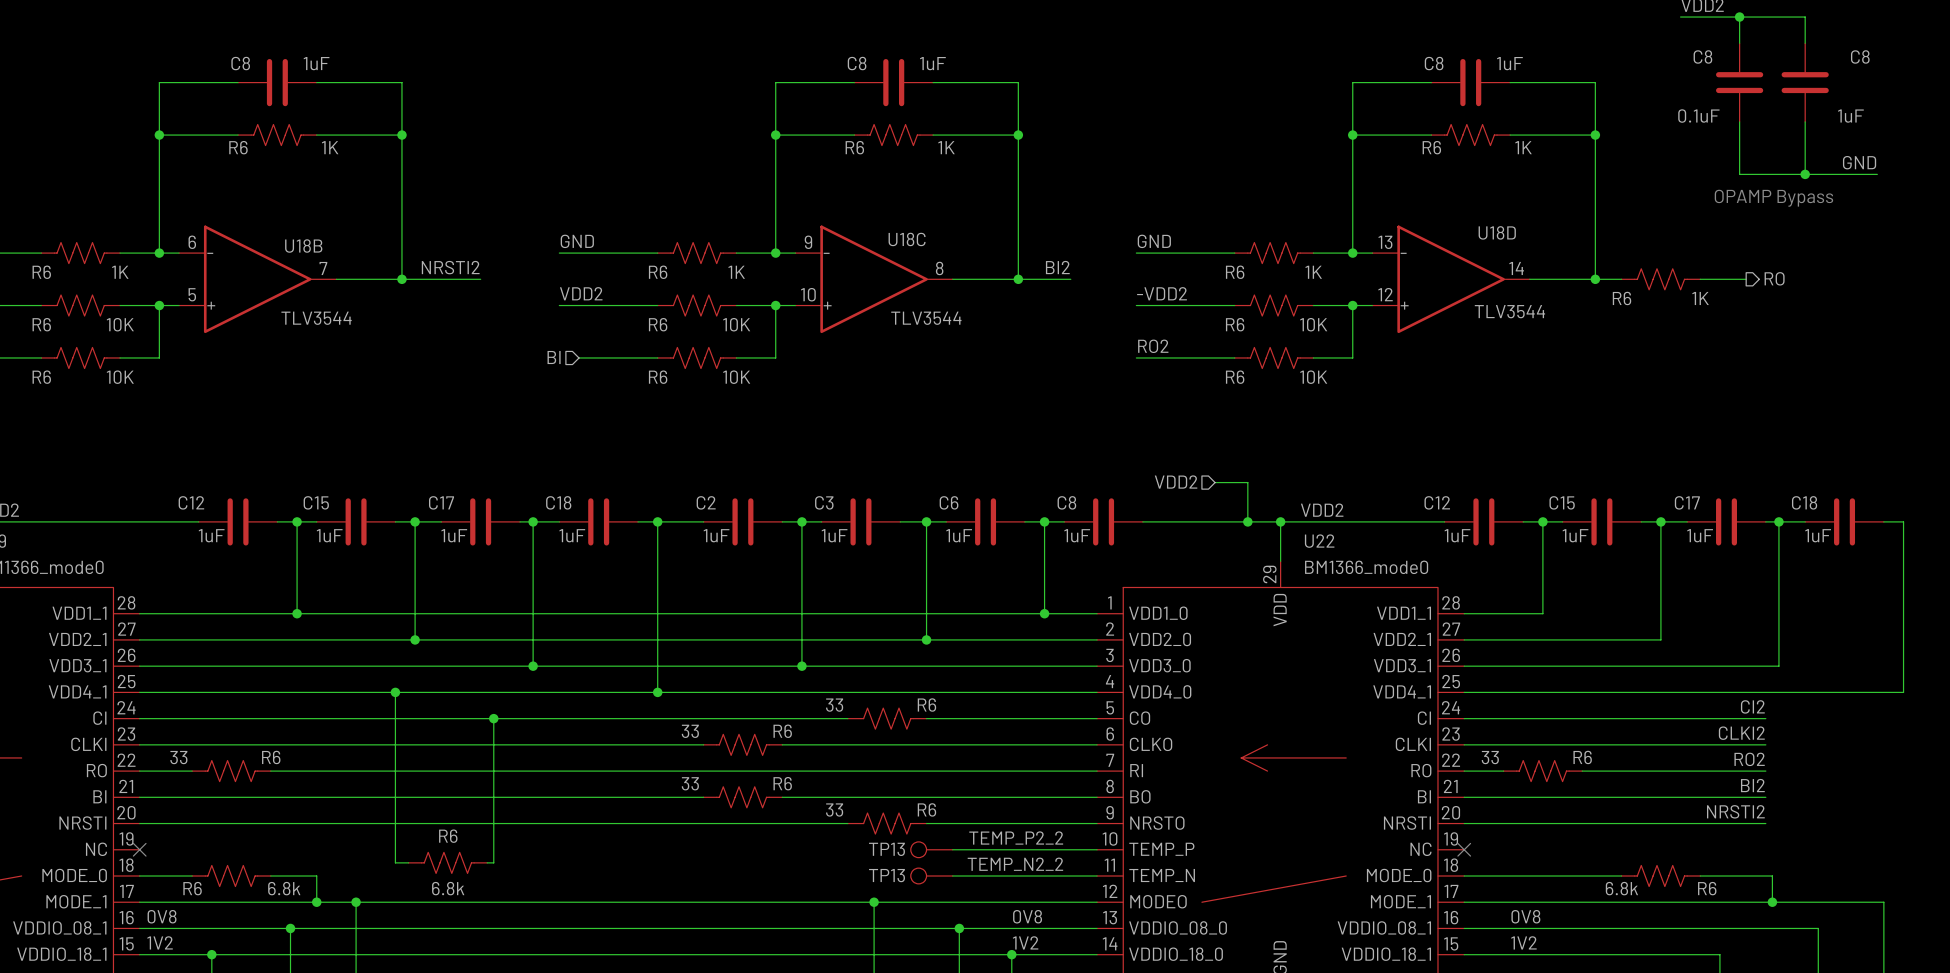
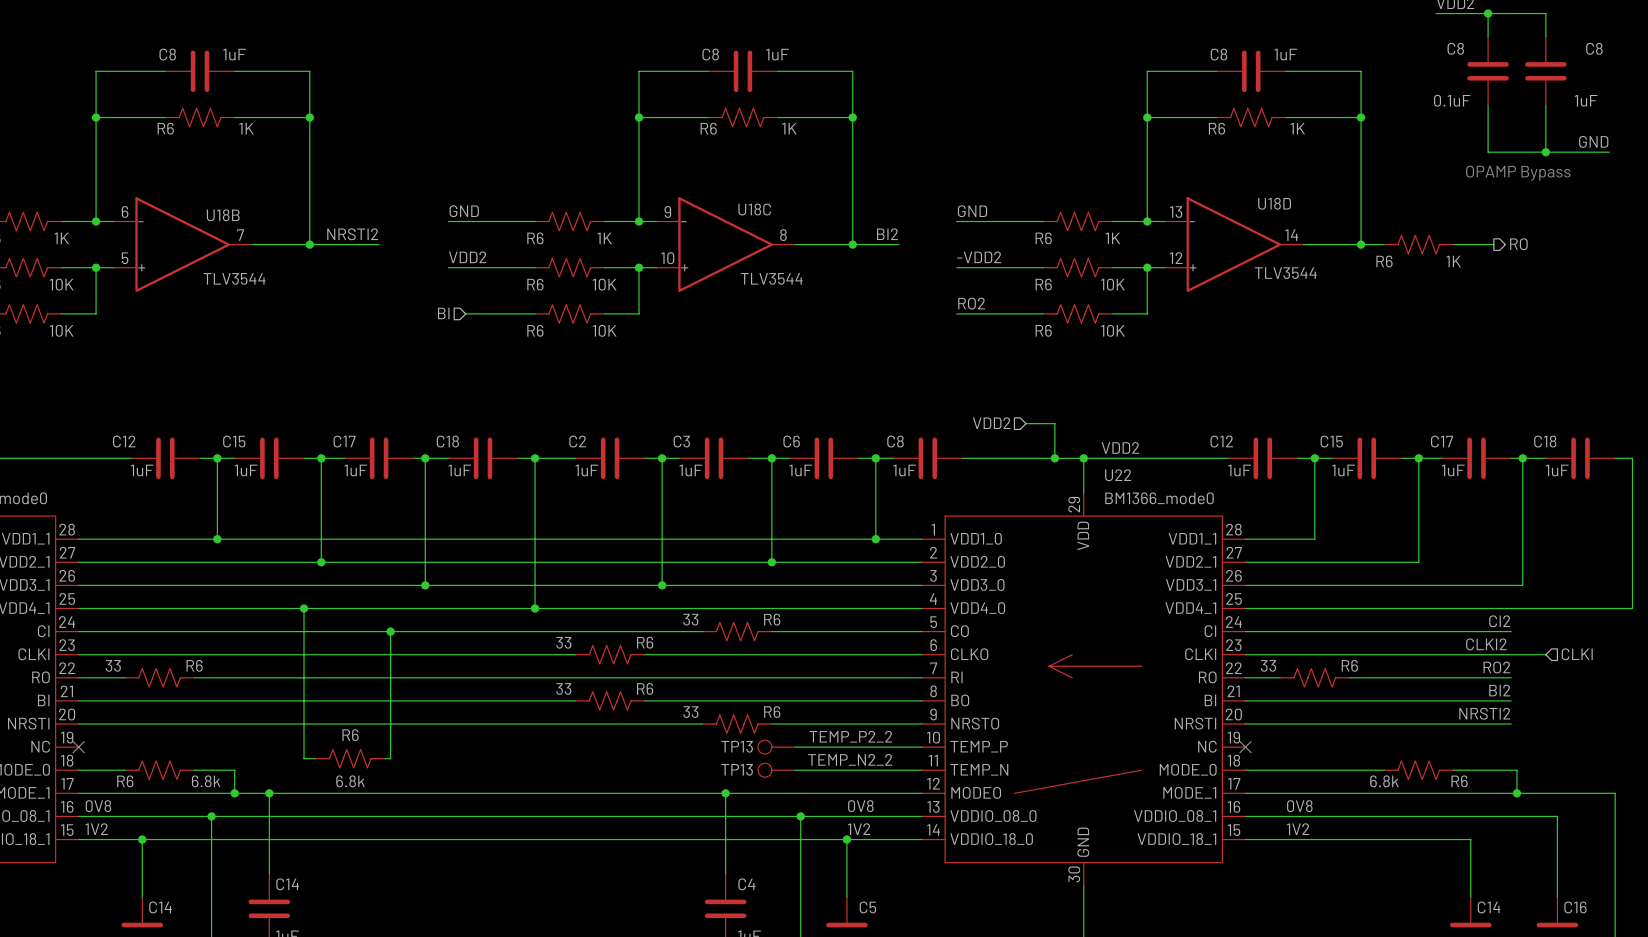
label position: CLKI2 (1741, 733) -> CLKI2 (1486, 644)
wire: none -> (1511, 654) (1545, 654)
hierarchical label: none -> CLKI (1577, 654)

